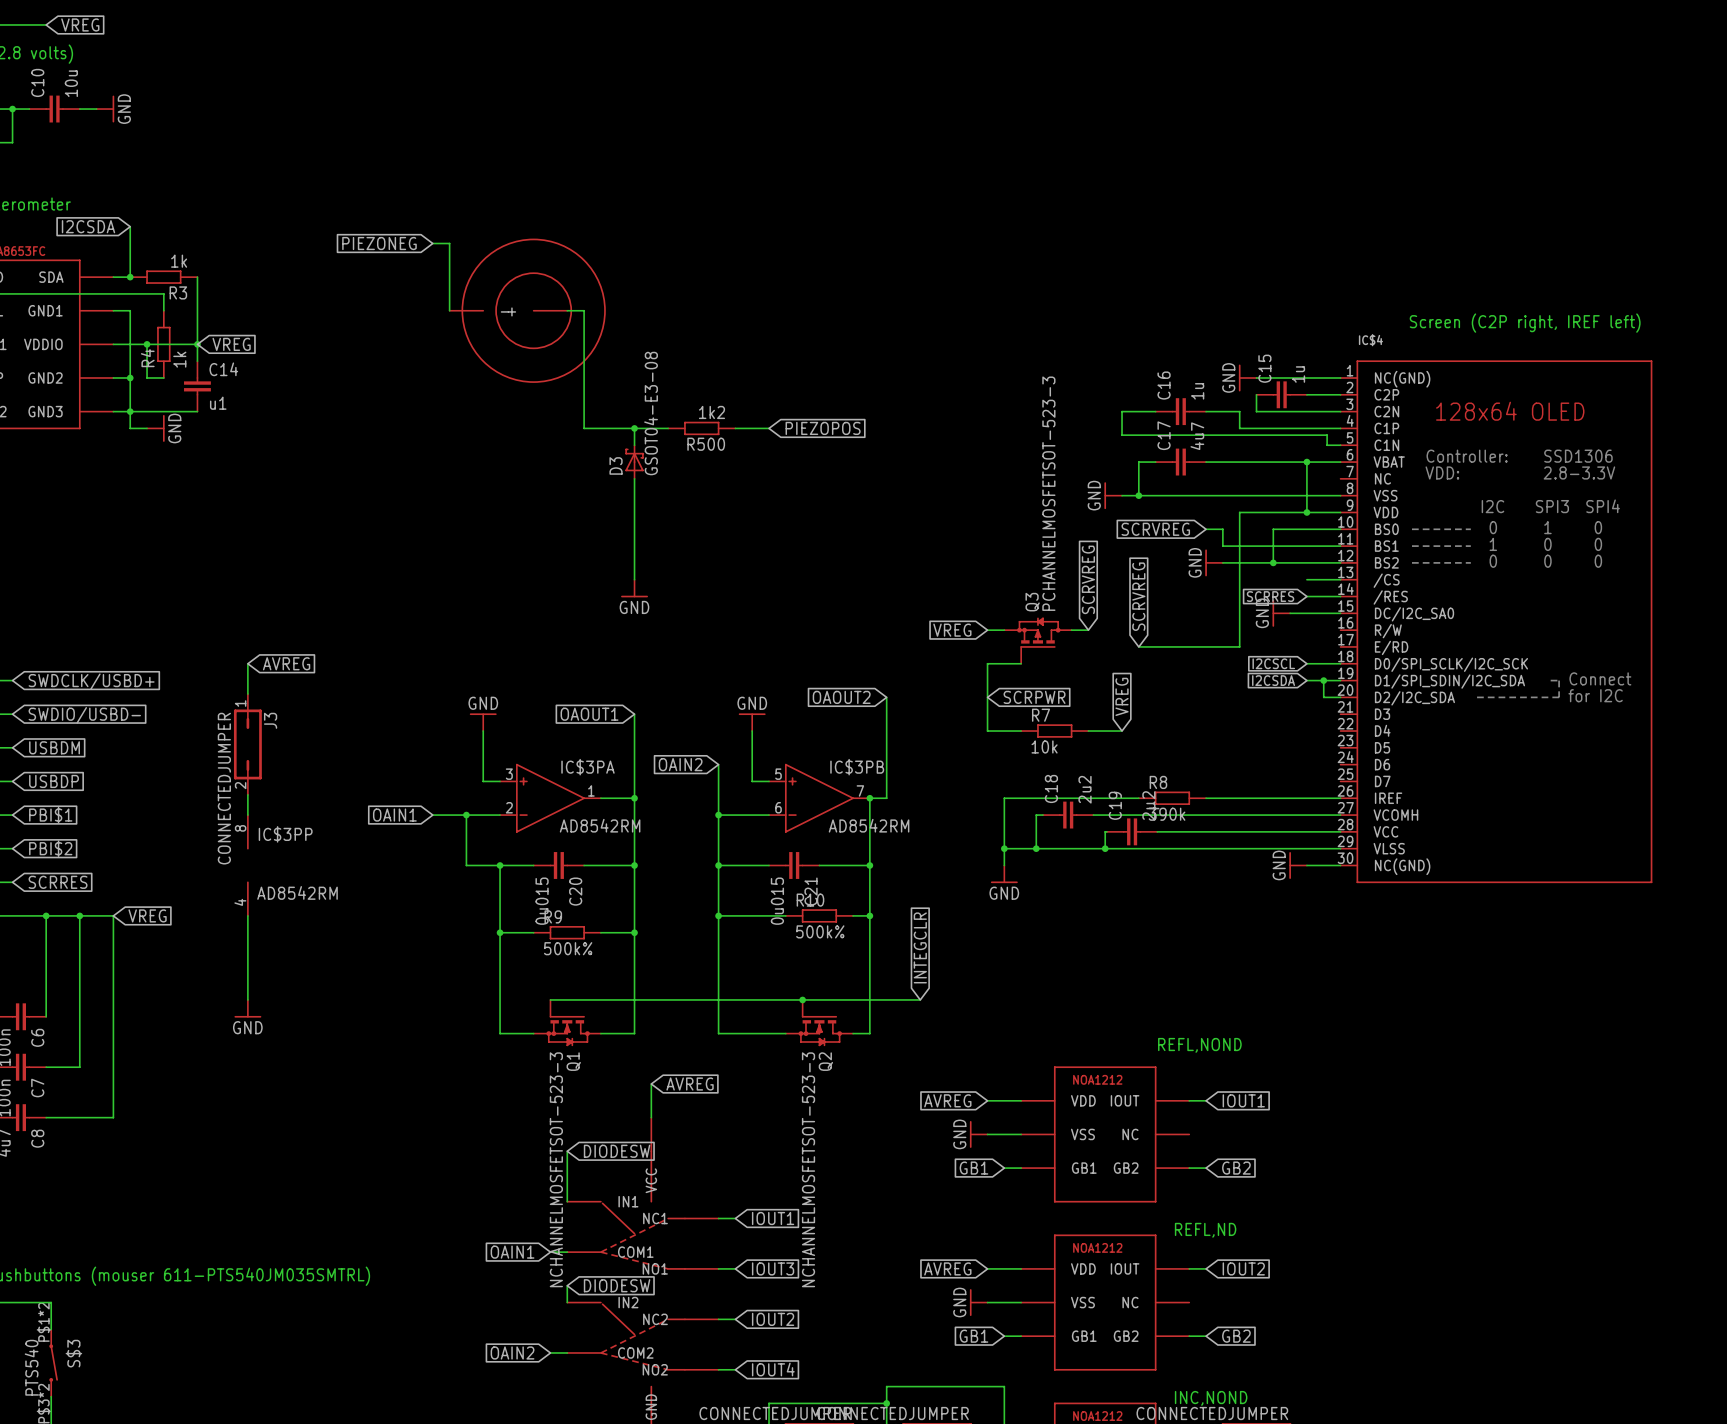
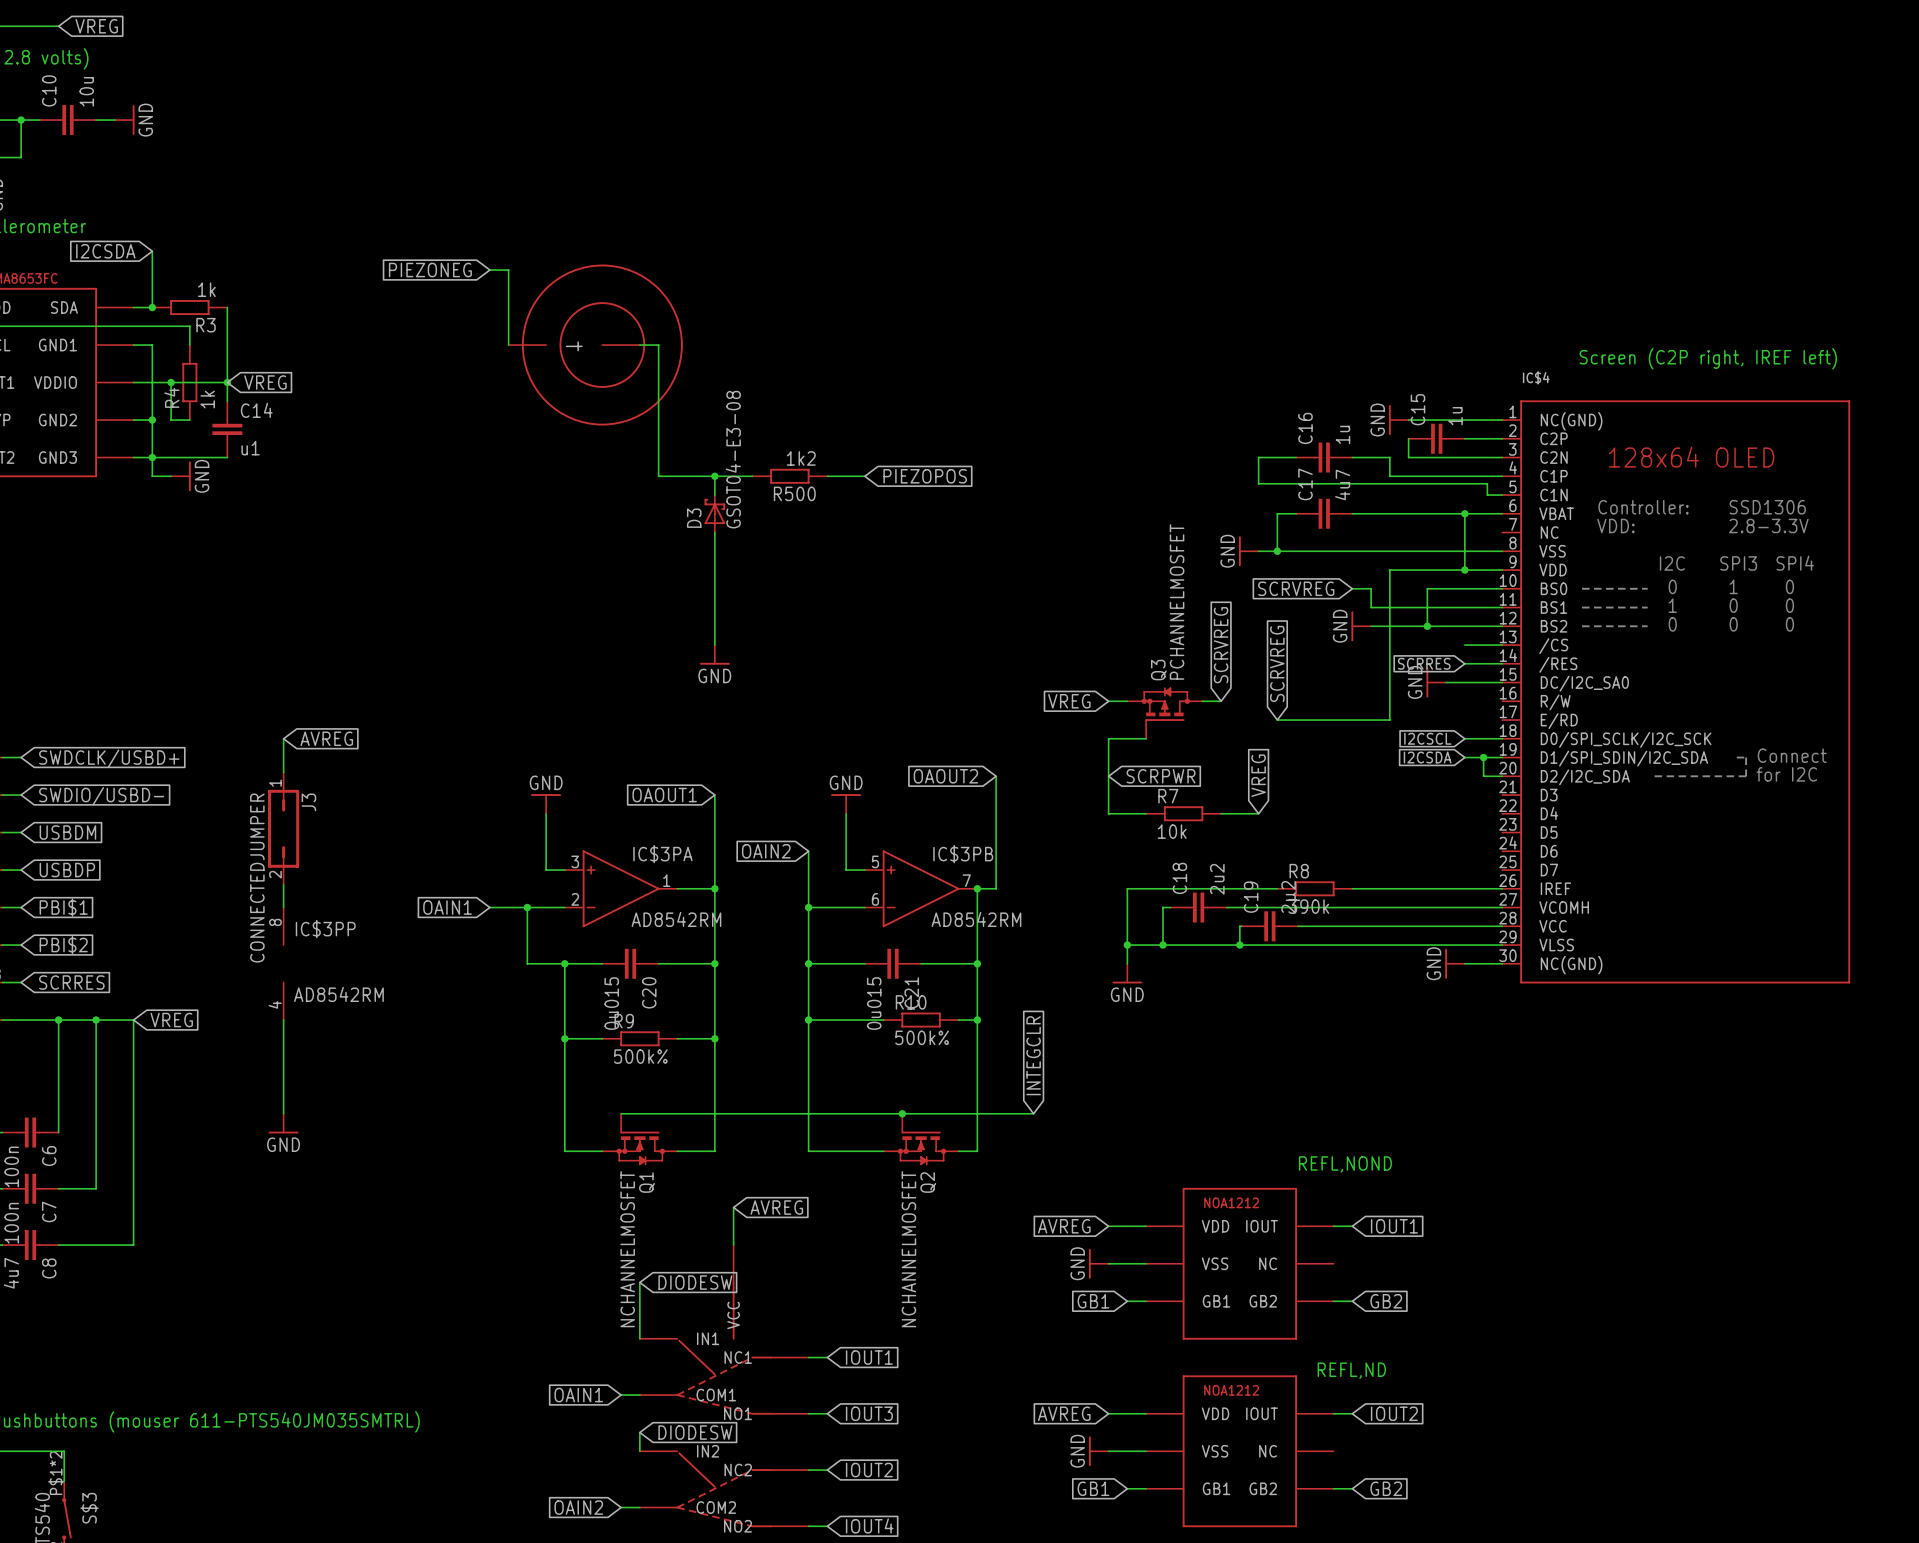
Q3 value: PCHANNELMOSFETSOT-523-3 (1048, 493) -> PCHANNELMOSFET (1177, 601)
Q1 value: NCHANNELMOSFETSOT-523-3 (556, 1169) -> NCHANNELMOSFET (627, 1249)
Q2 value: NCHANNELMOSFETSOT-523-3 (808, 1169) -> NCHANNELMOSFET (908, 1249)

